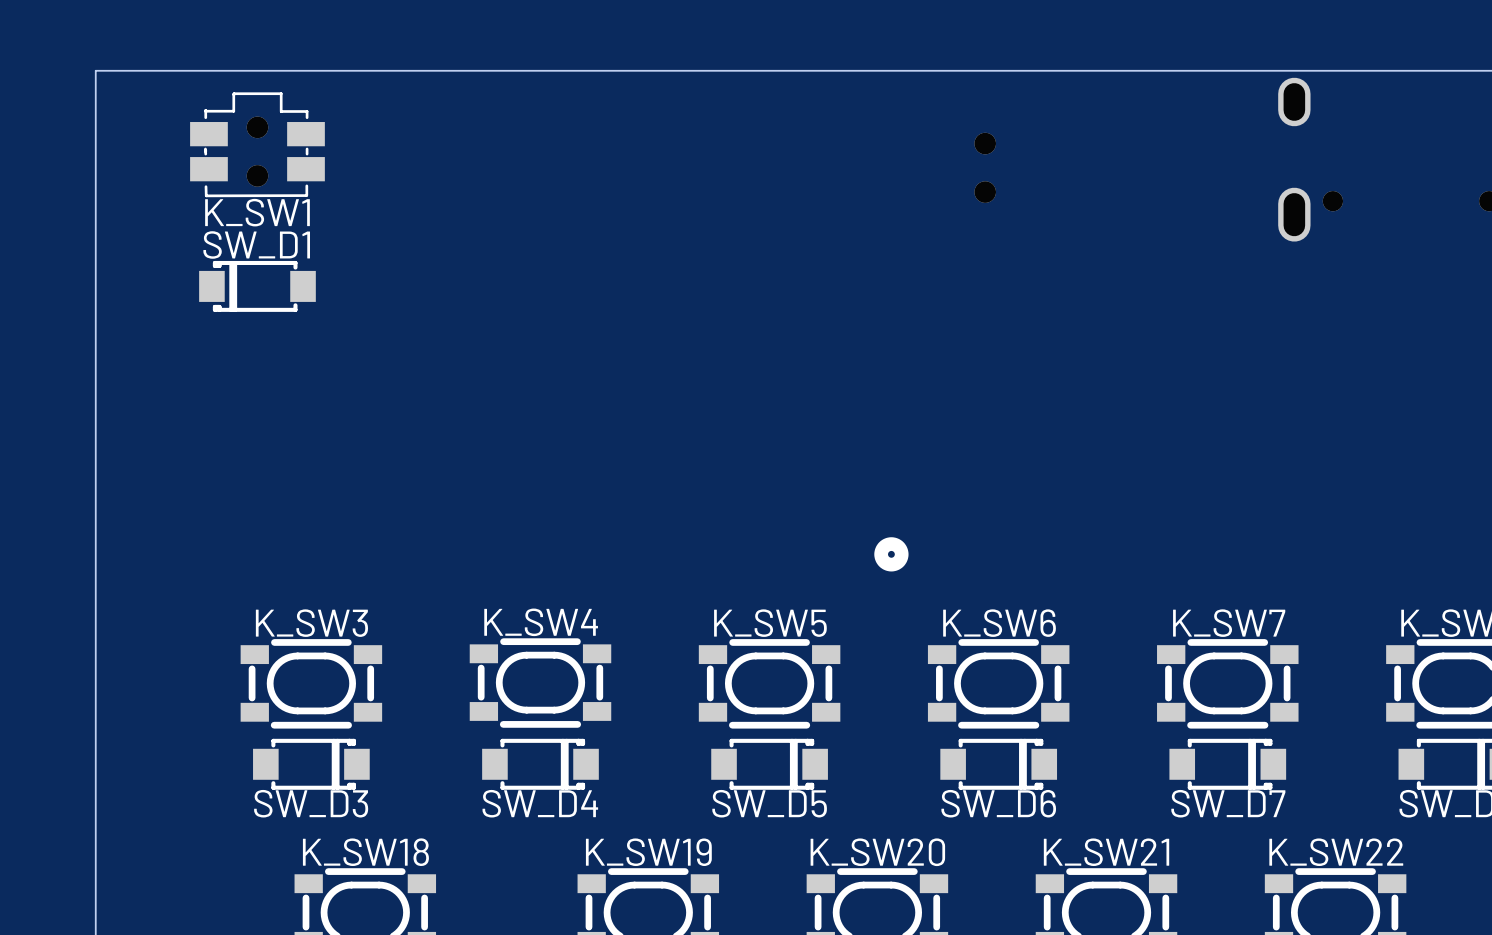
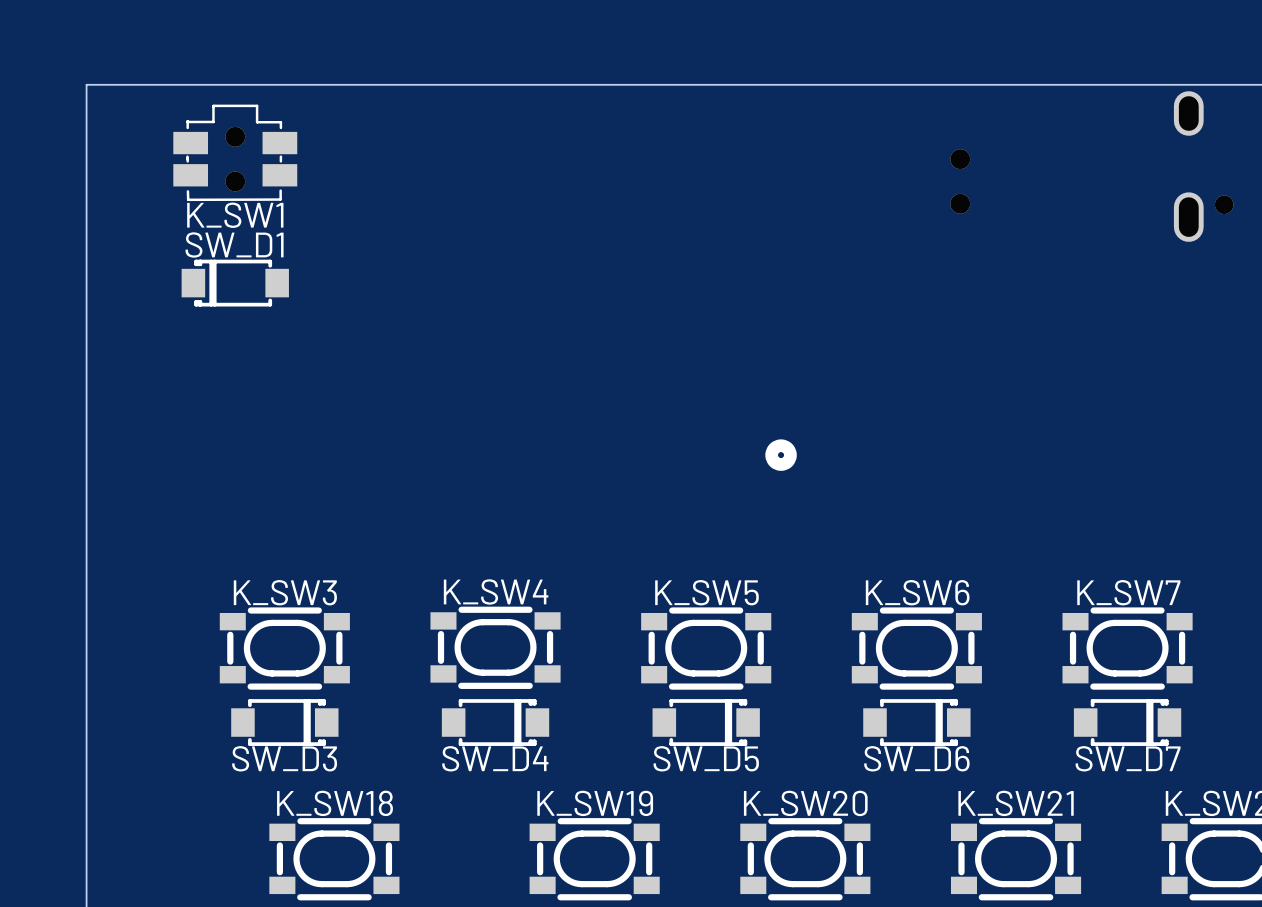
part position: (985, 167) -> (960, 181)
part position: (891, 554) -> (781, 455)

